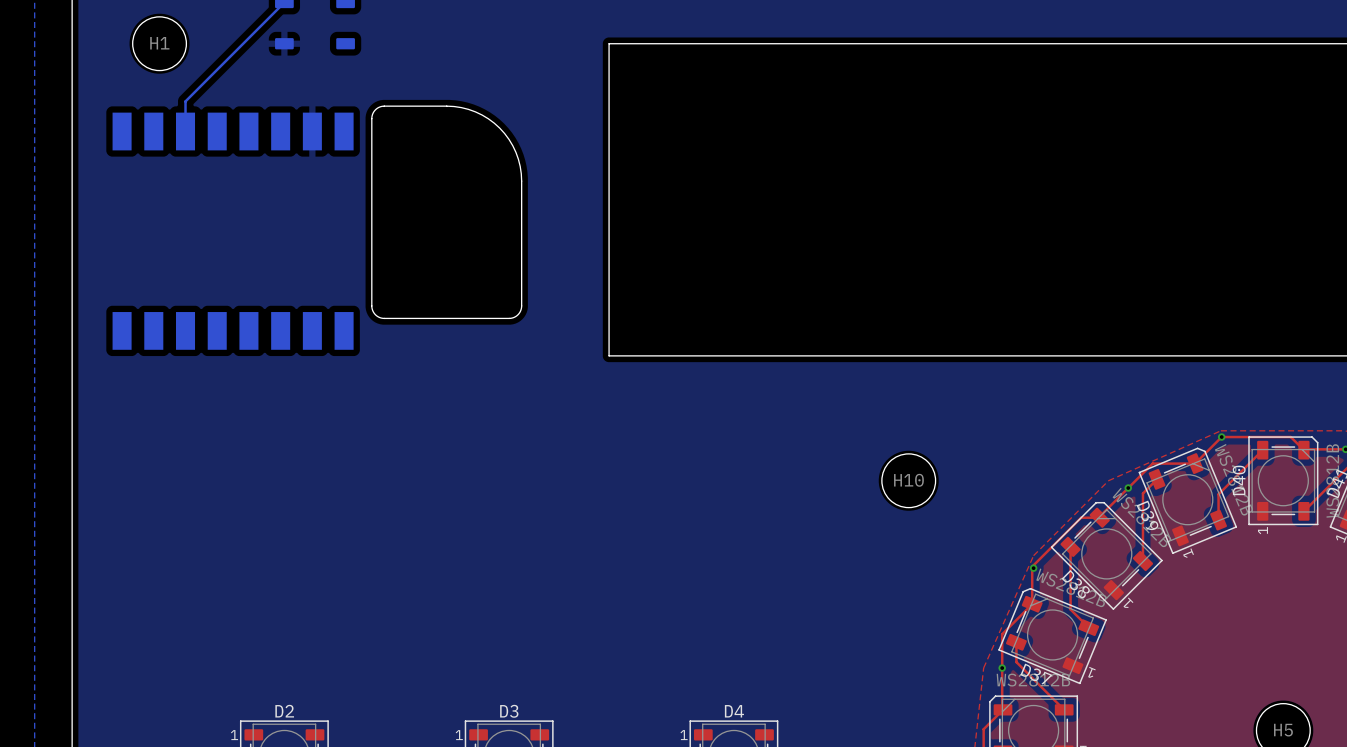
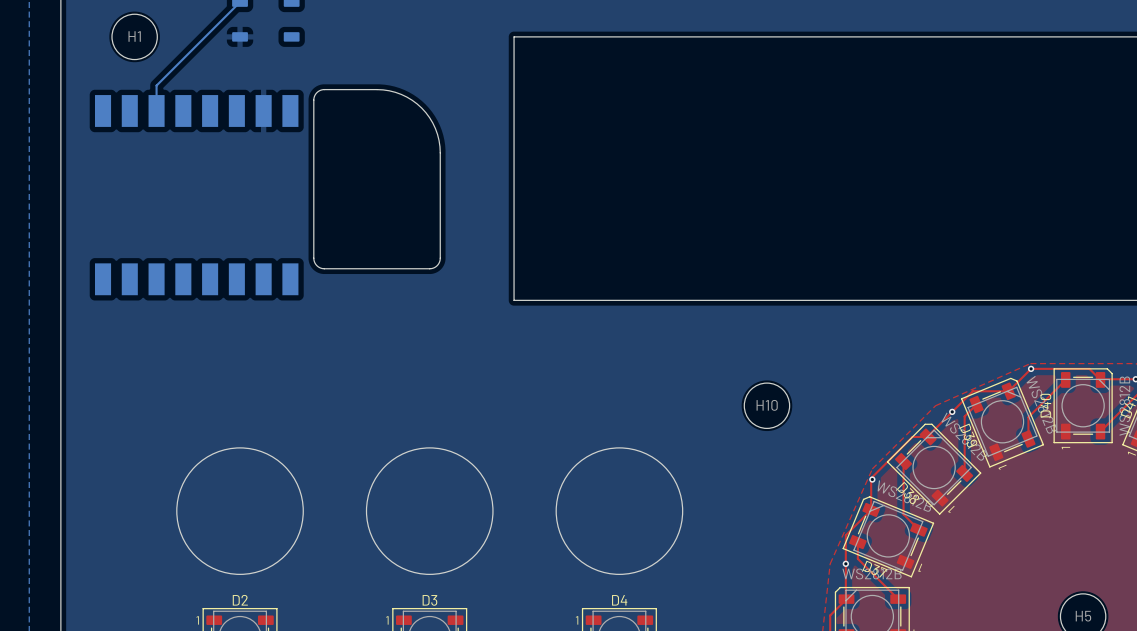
round board edge: none -> [176, 447, 304, 575]
round board edge: none -> [366, 447, 494, 575]
round board edge: none -> [555, 447, 683, 575]

